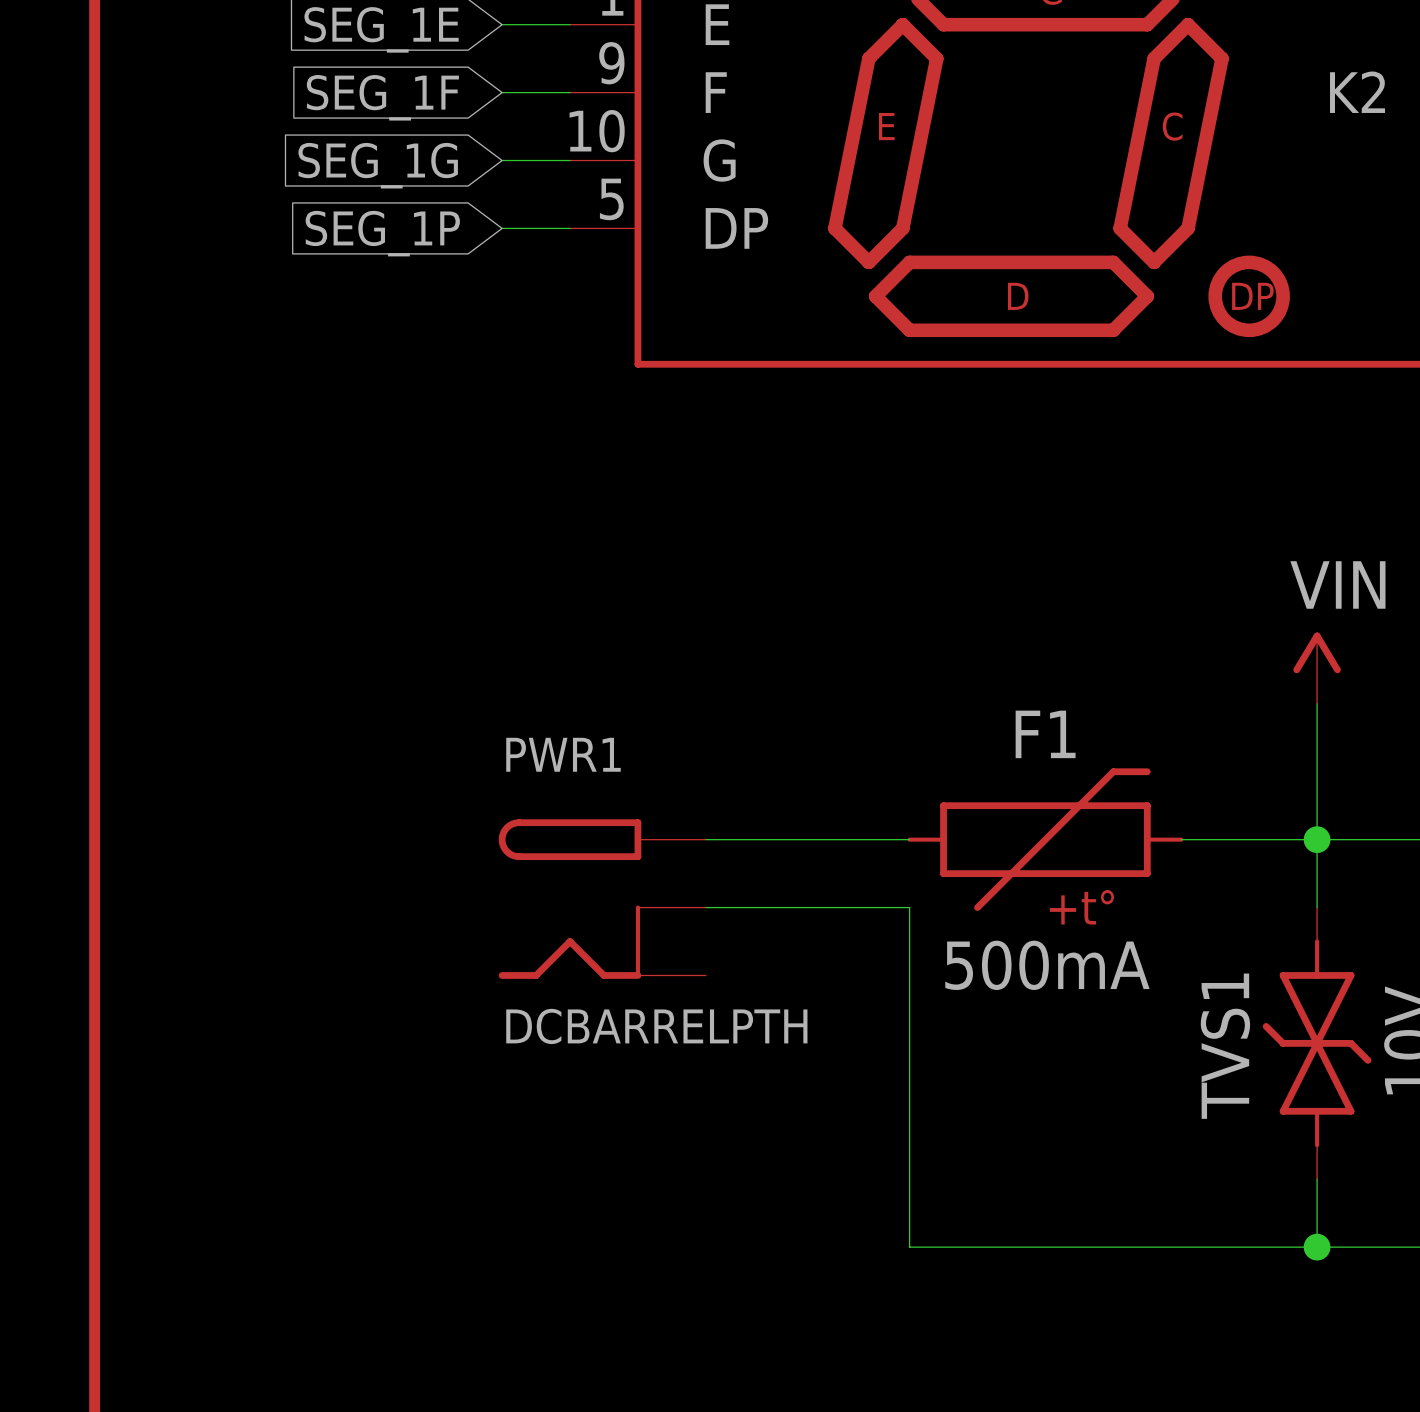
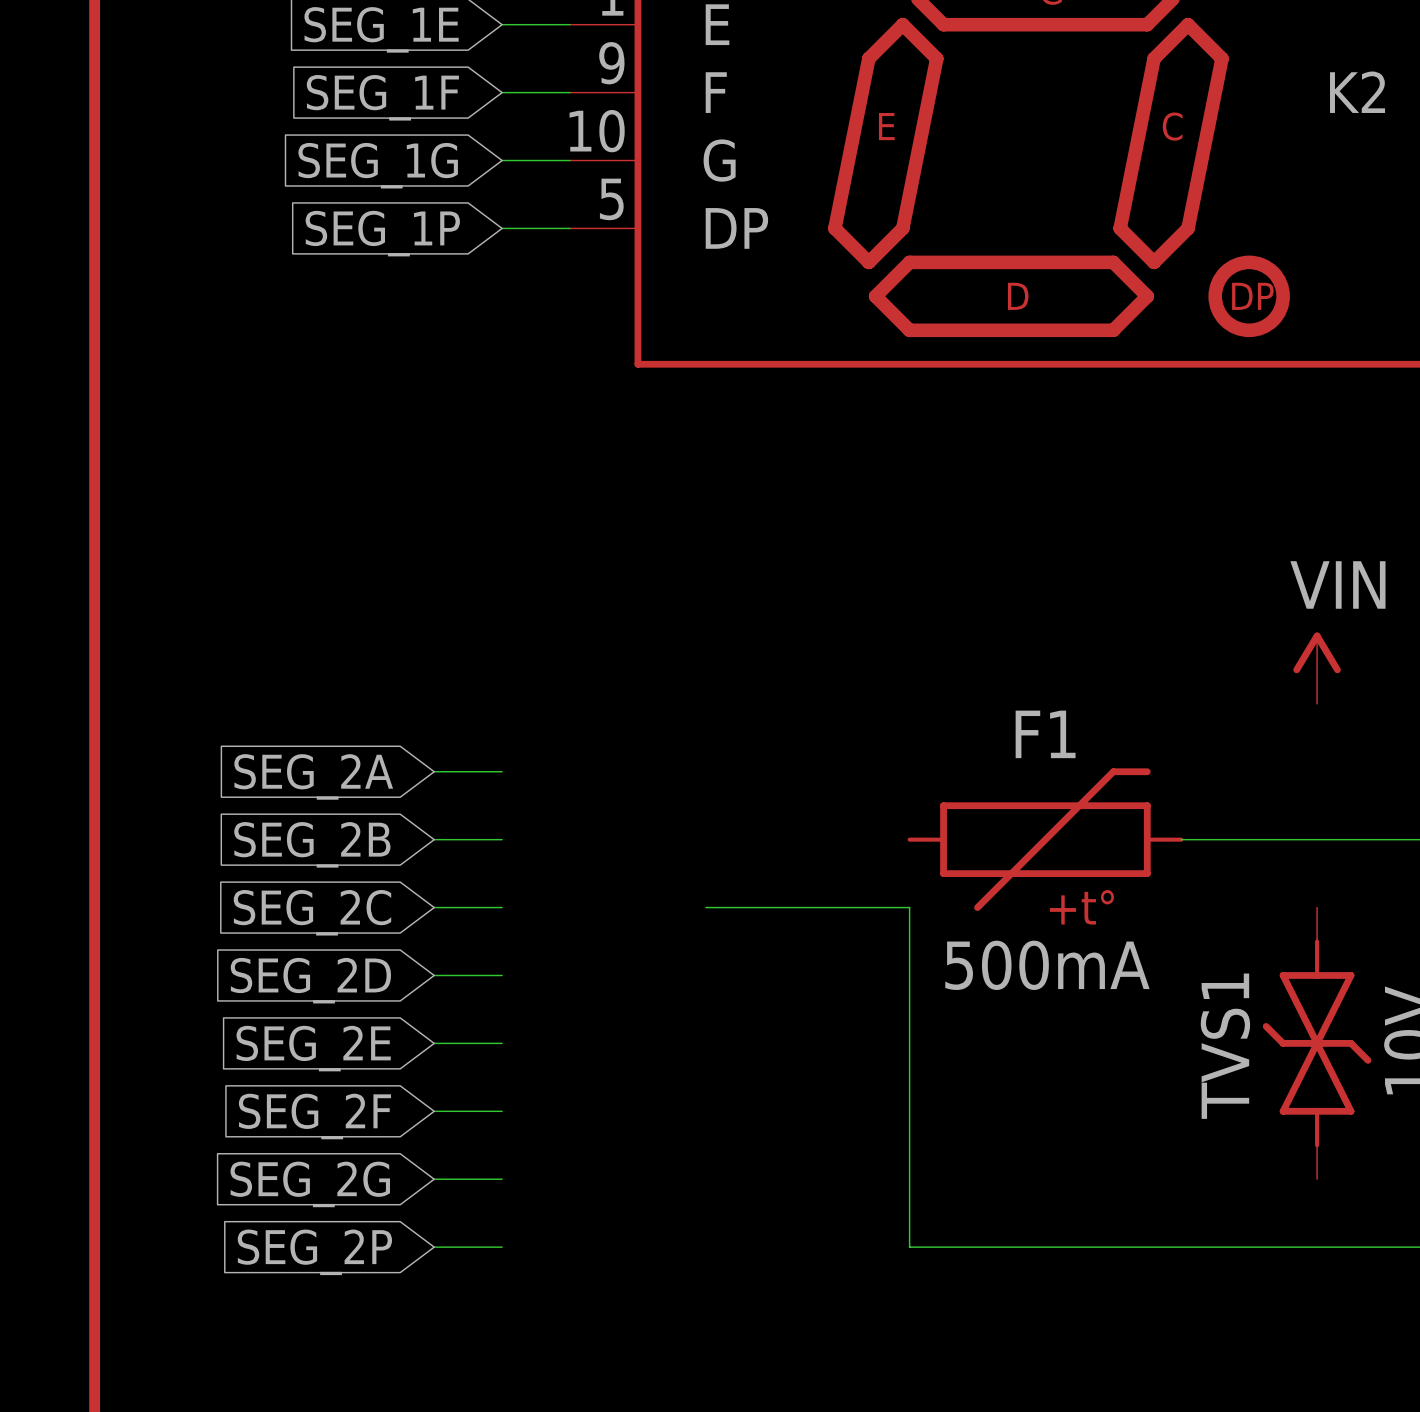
wire: (1317, 703) (1317, 907) -> none
wire: none -> (434, 771) (502, 771)
global label: none -> SEG_2A (313, 776)
wire: none -> (434, 839) (502, 839)
wire: (705, 839) (909, 839) -> none
junction: (1317, 839) -> none
global label: none -> SEG_2B (312, 844)
PWR1: DCBARRELPTH (602, 899) -> none
wire: none -> (434, 907) (502, 907)
global label: none -> SEG_2C (312, 912)
wire: none -> (434, 975) (502, 975)
global label: none -> SEG_2D (310, 980)
wire: none -> (434, 1043) (502, 1043)
global label: none -> SEG_2E (313, 1048)
wire: none -> (434, 1111) (502, 1111)
global label: none -> SEG_2F (314, 1116)
wire: none -> (434, 1179) (502, 1179)
wire: (1317, 1179) (1317, 1247) -> none
global label: none -> SEG_2G (310, 1184)
wire: none -> (434, 1247) (502, 1247)
junction: (1317, 1247) -> none
global label: none -> SEG_2P (314, 1252)

